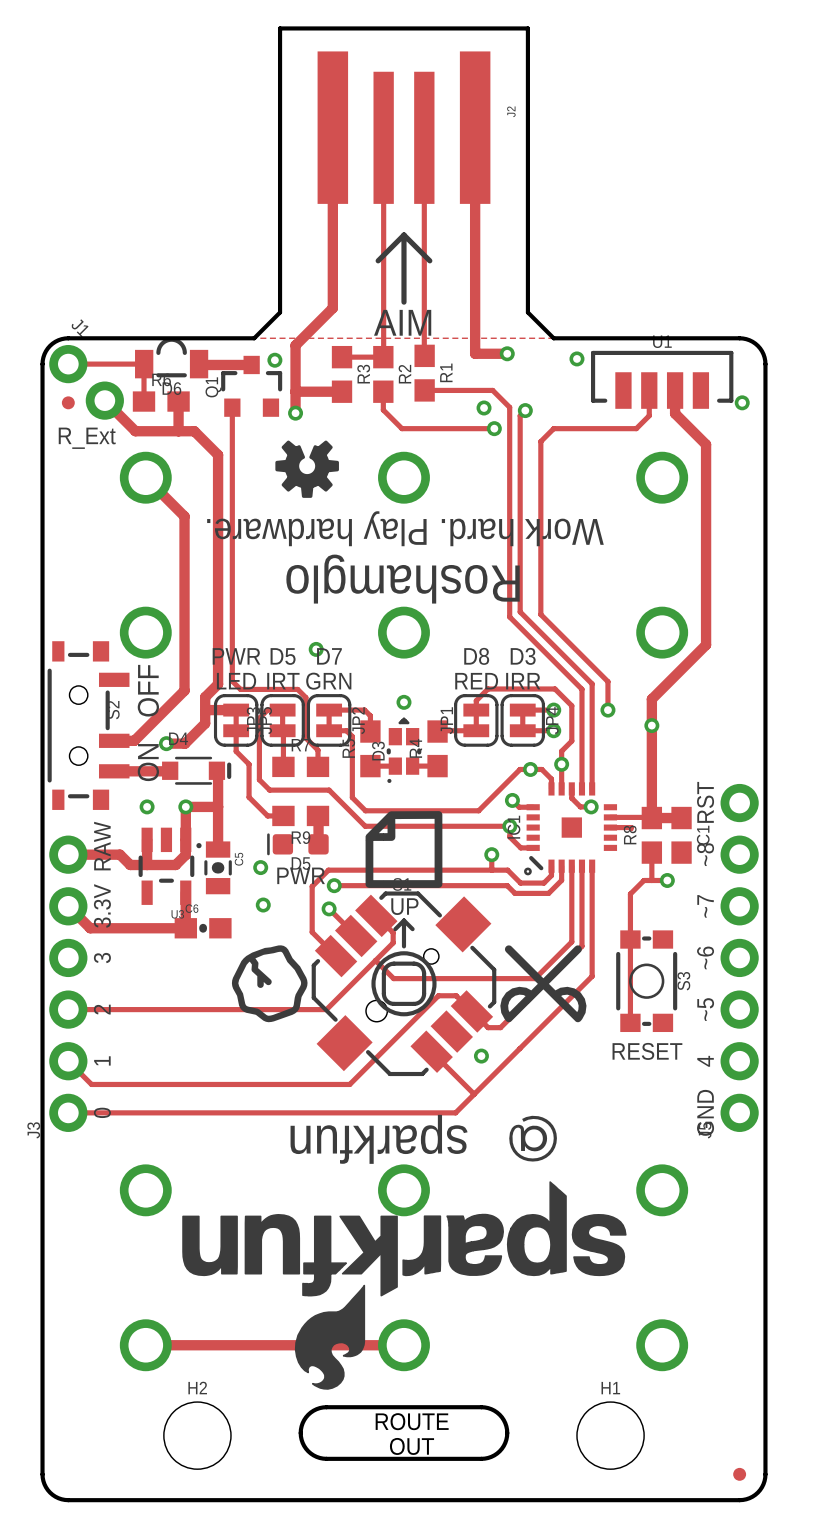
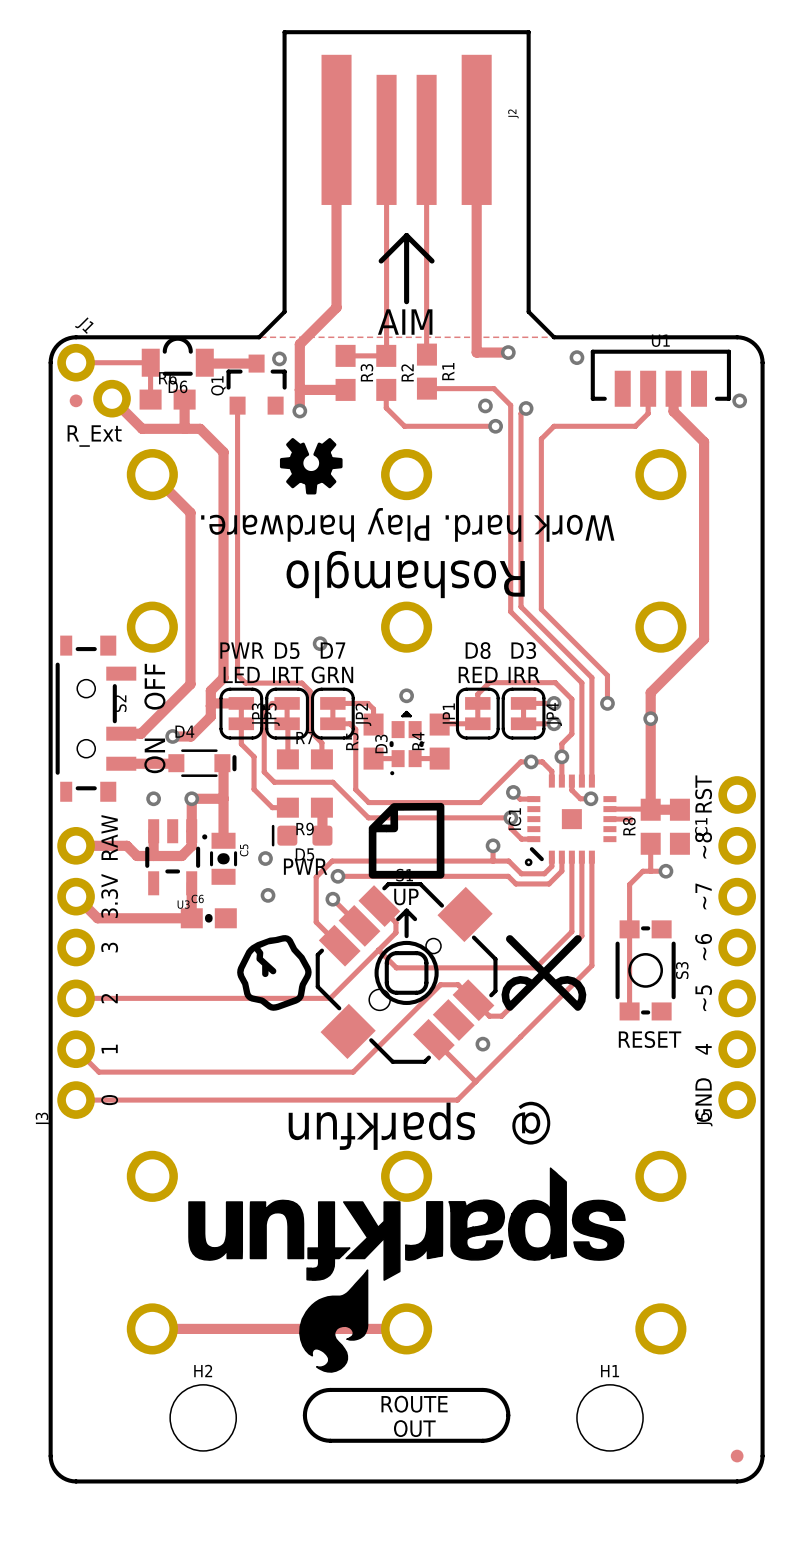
drawing: [509, 1115, 557, 1162] -> none
text: none -> @ (531, 1123)

